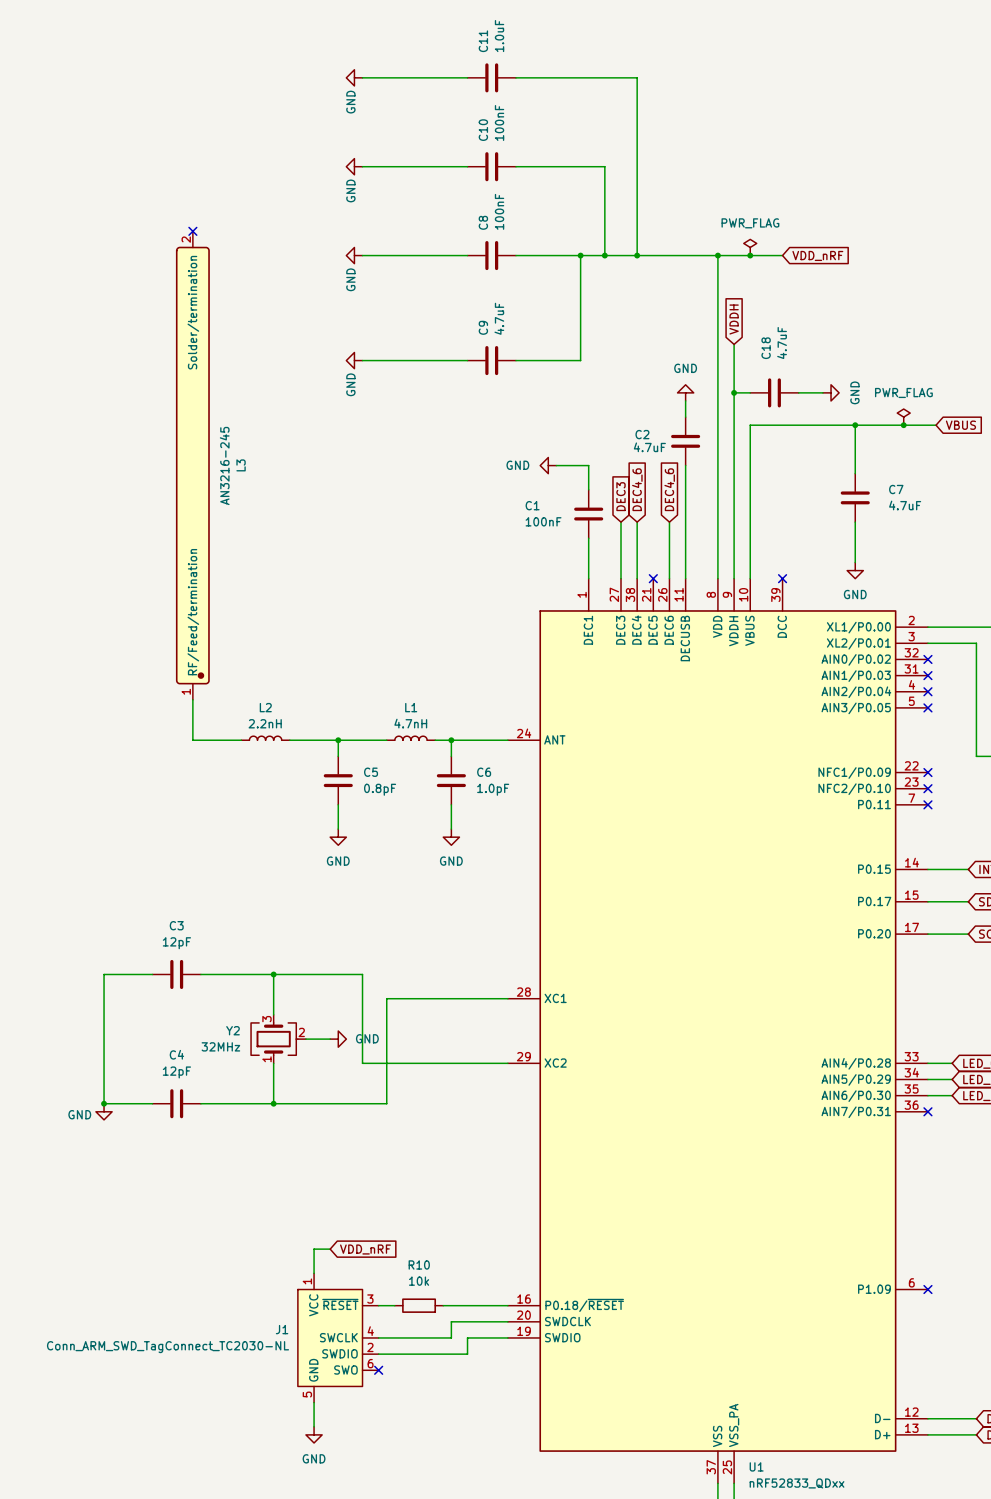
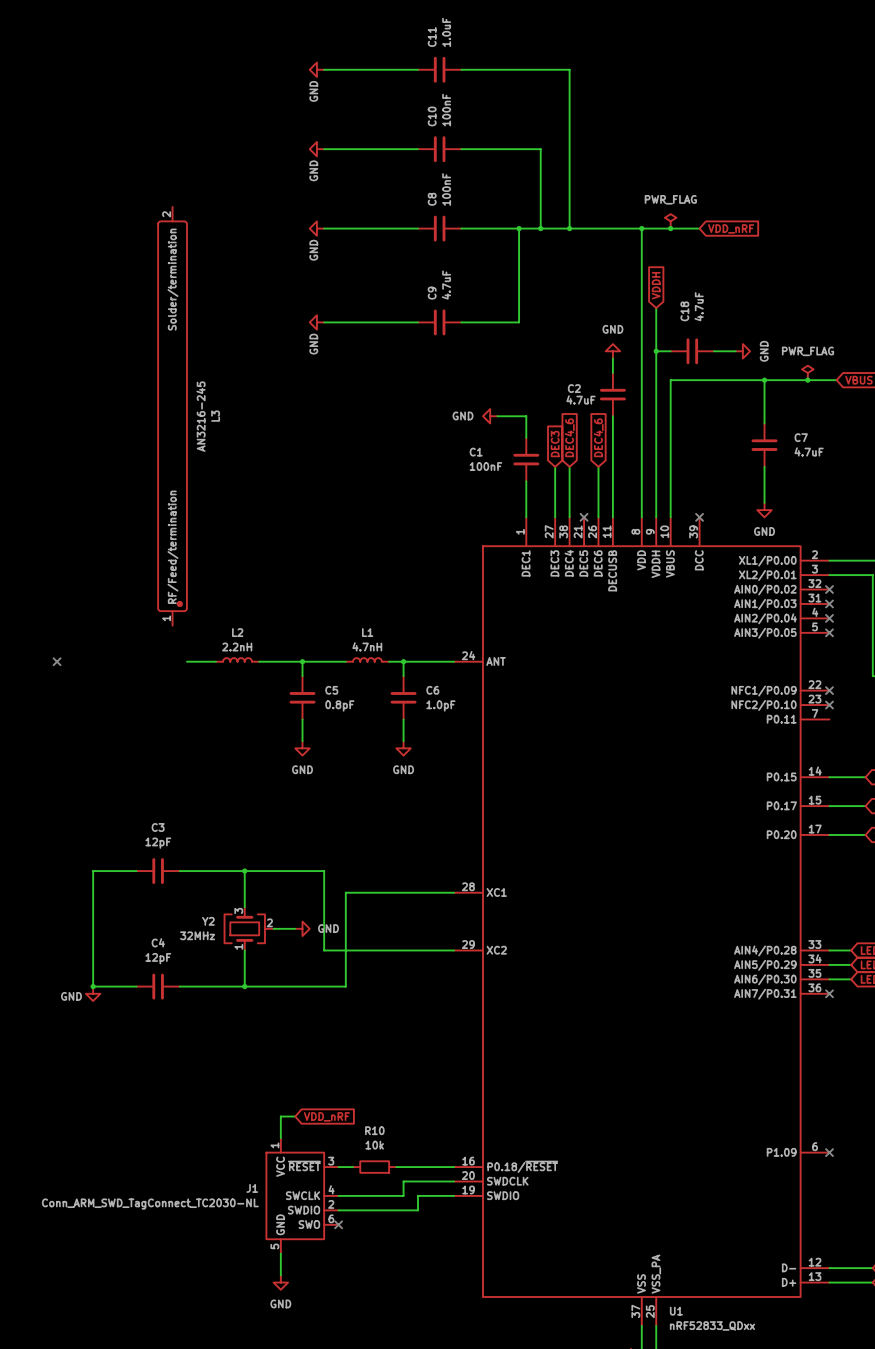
no-connect mark: (192, 231) -> none
wire: (192, 699) (192, 740) (209, 740) -> none
no-connect mark: none -> (57, 661)
no-connect mark: (927, 804) -> none

